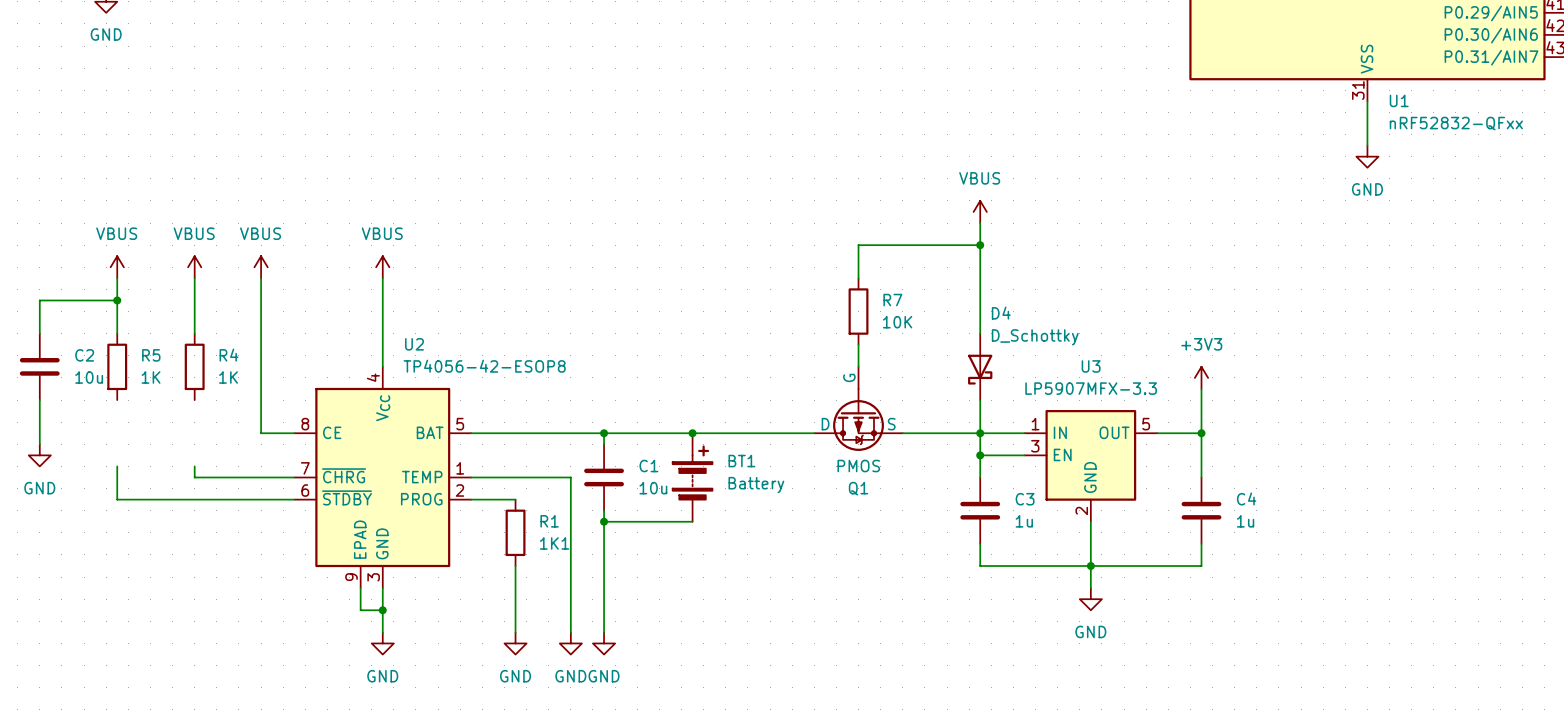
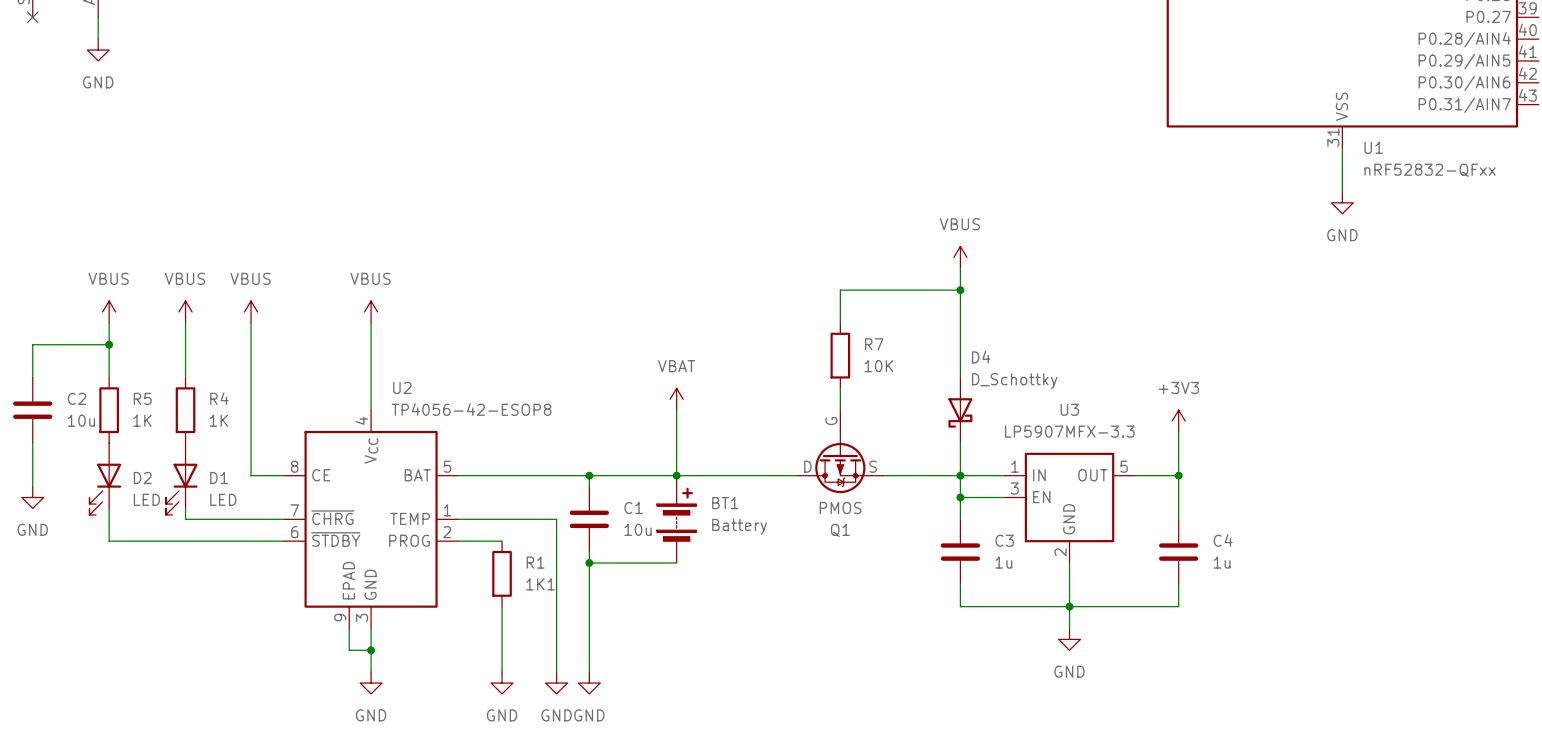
power symbol: none -> VBAT (676, 399)
wire: none -> (676, 410) (676, 475)
D2: none -> LED (105, 478)
D1: none -> LED (181, 478)

